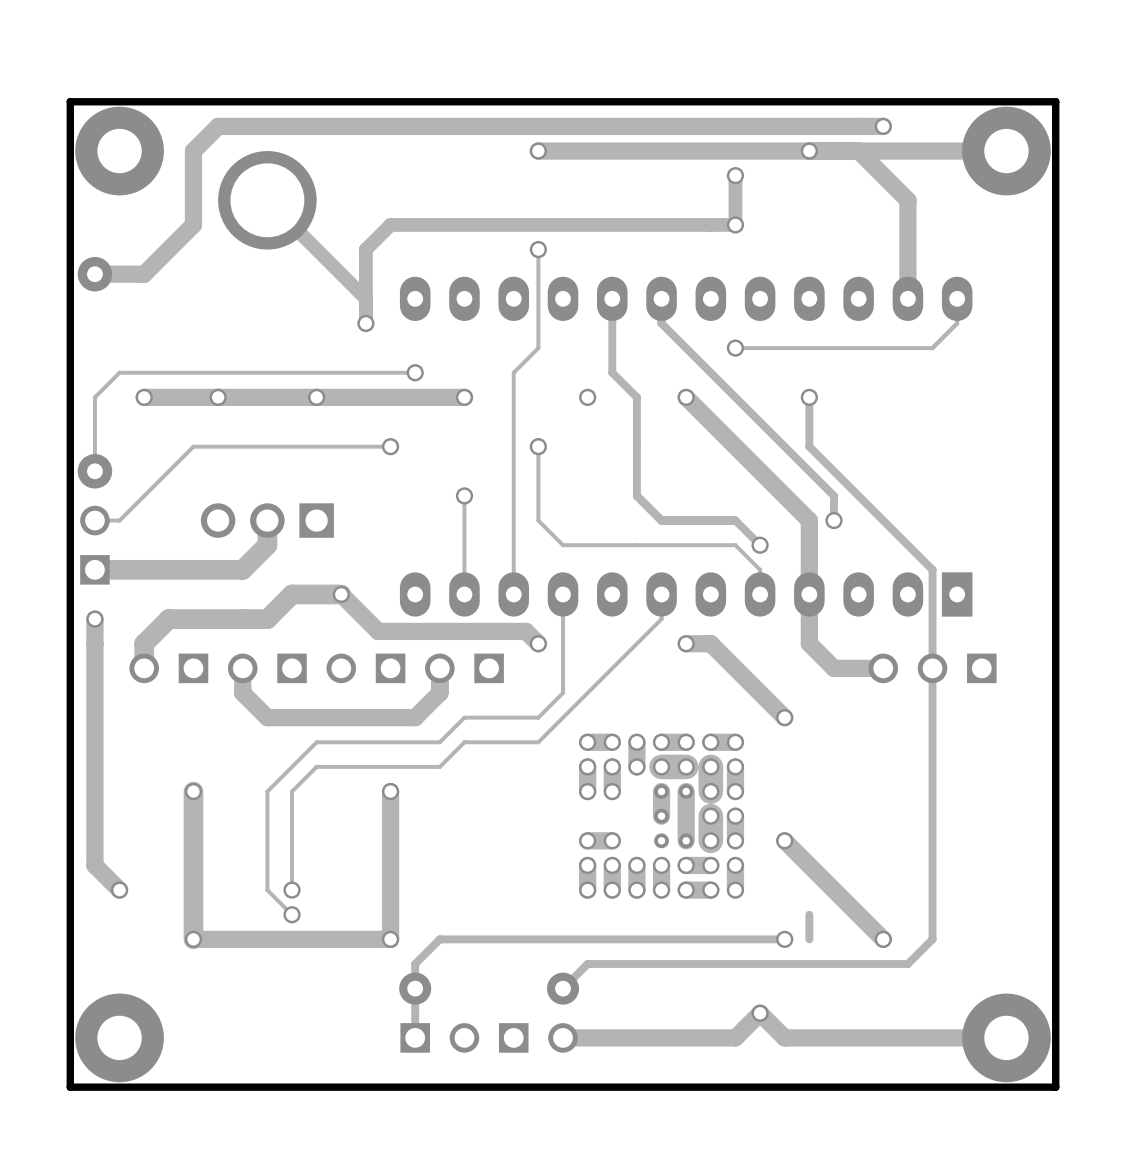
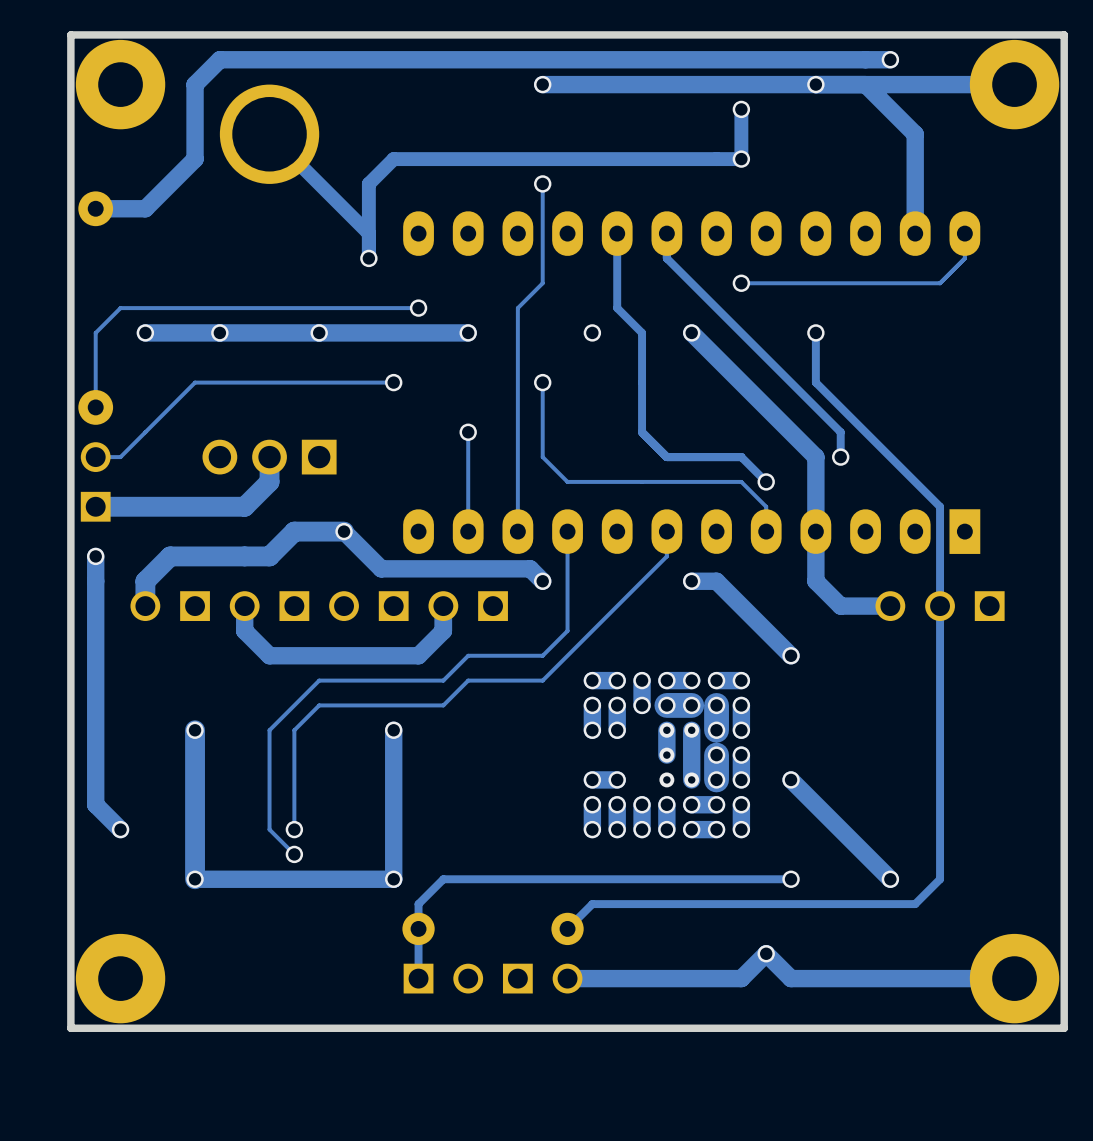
track: (809, 914) (809, 939) -> none

